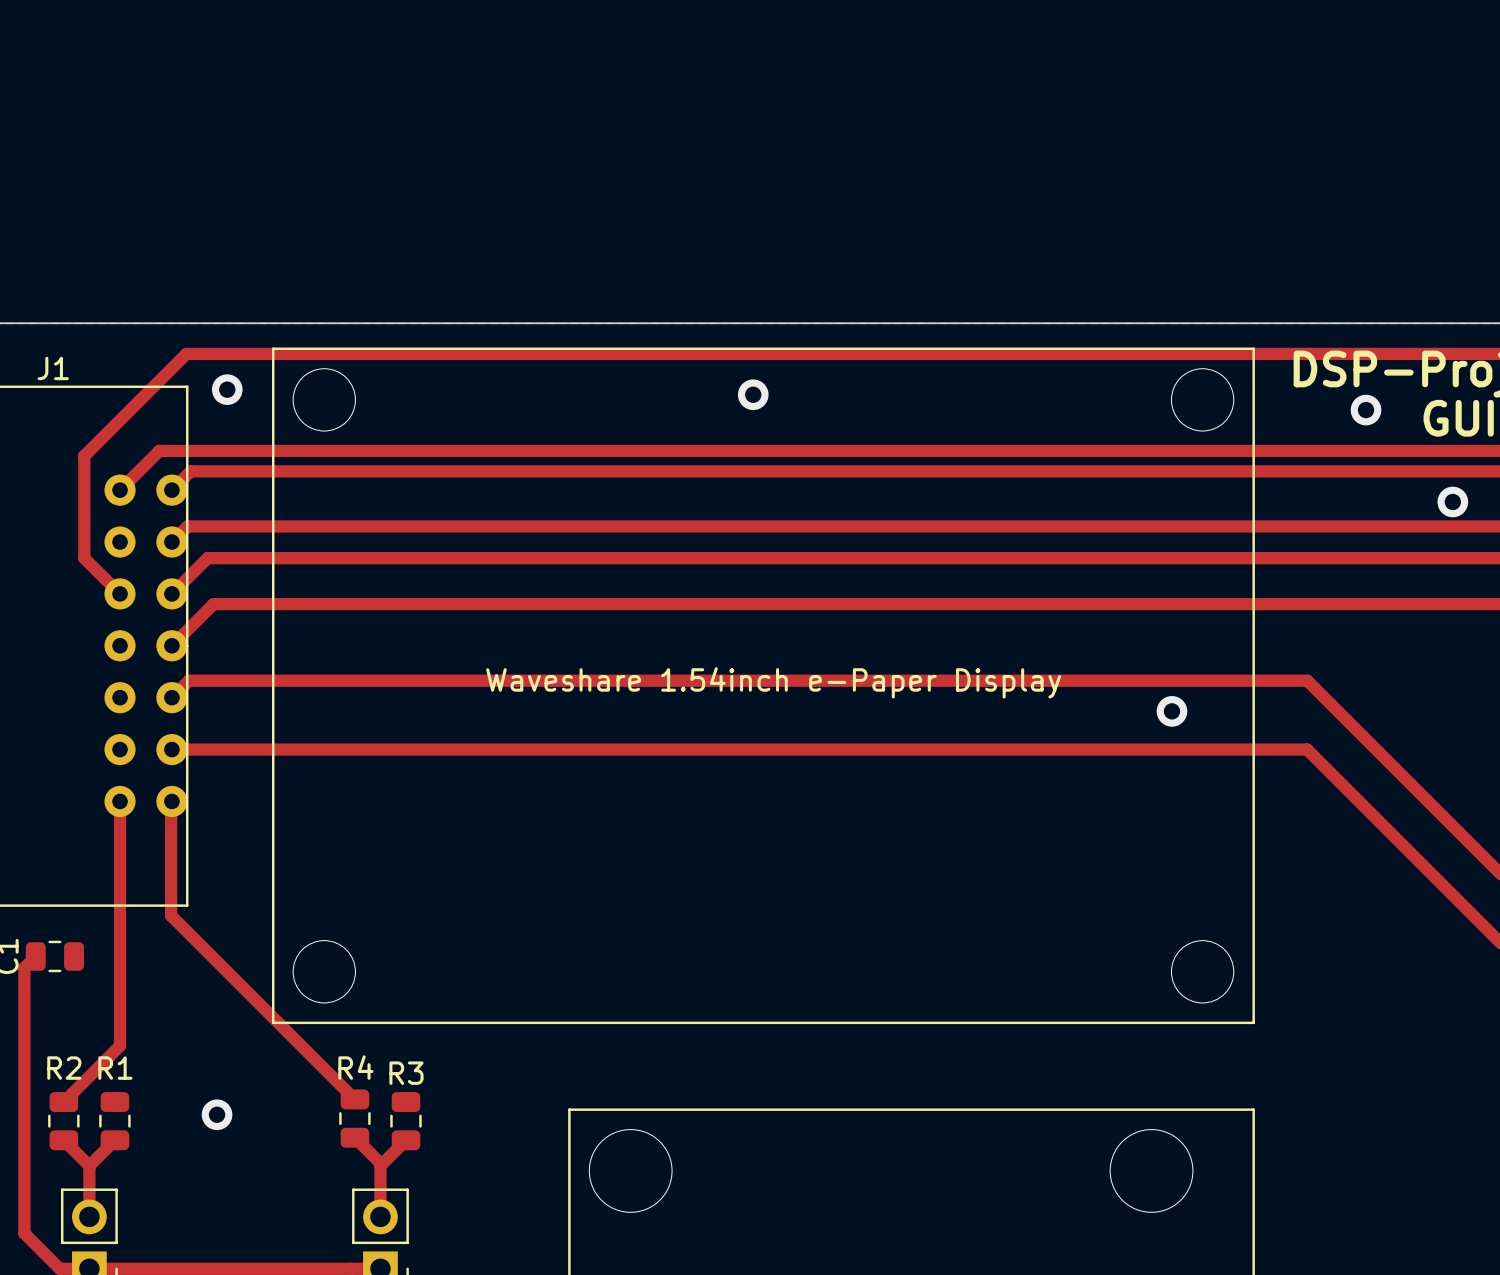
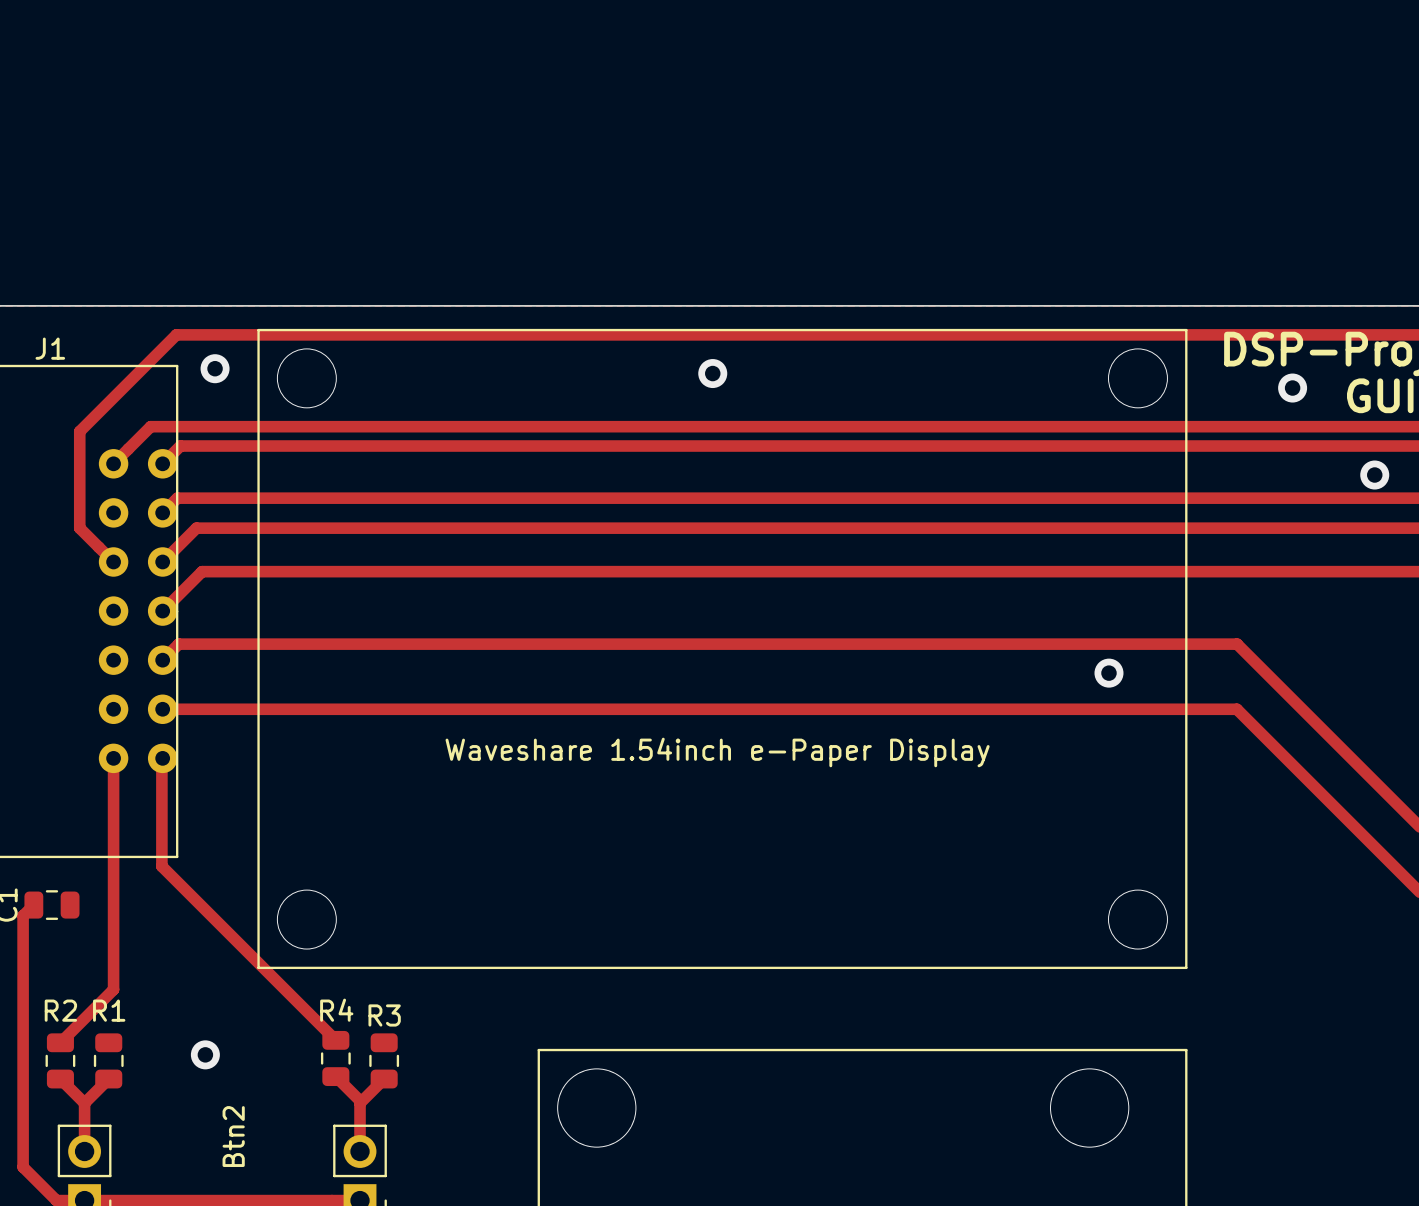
text position: Waveshare 1.54inch e-Paper Display (773, 682) -> Waveshare 1.54inch e-Paper Display (717, 752)
text: none -> Btn2 (233, 1136)

